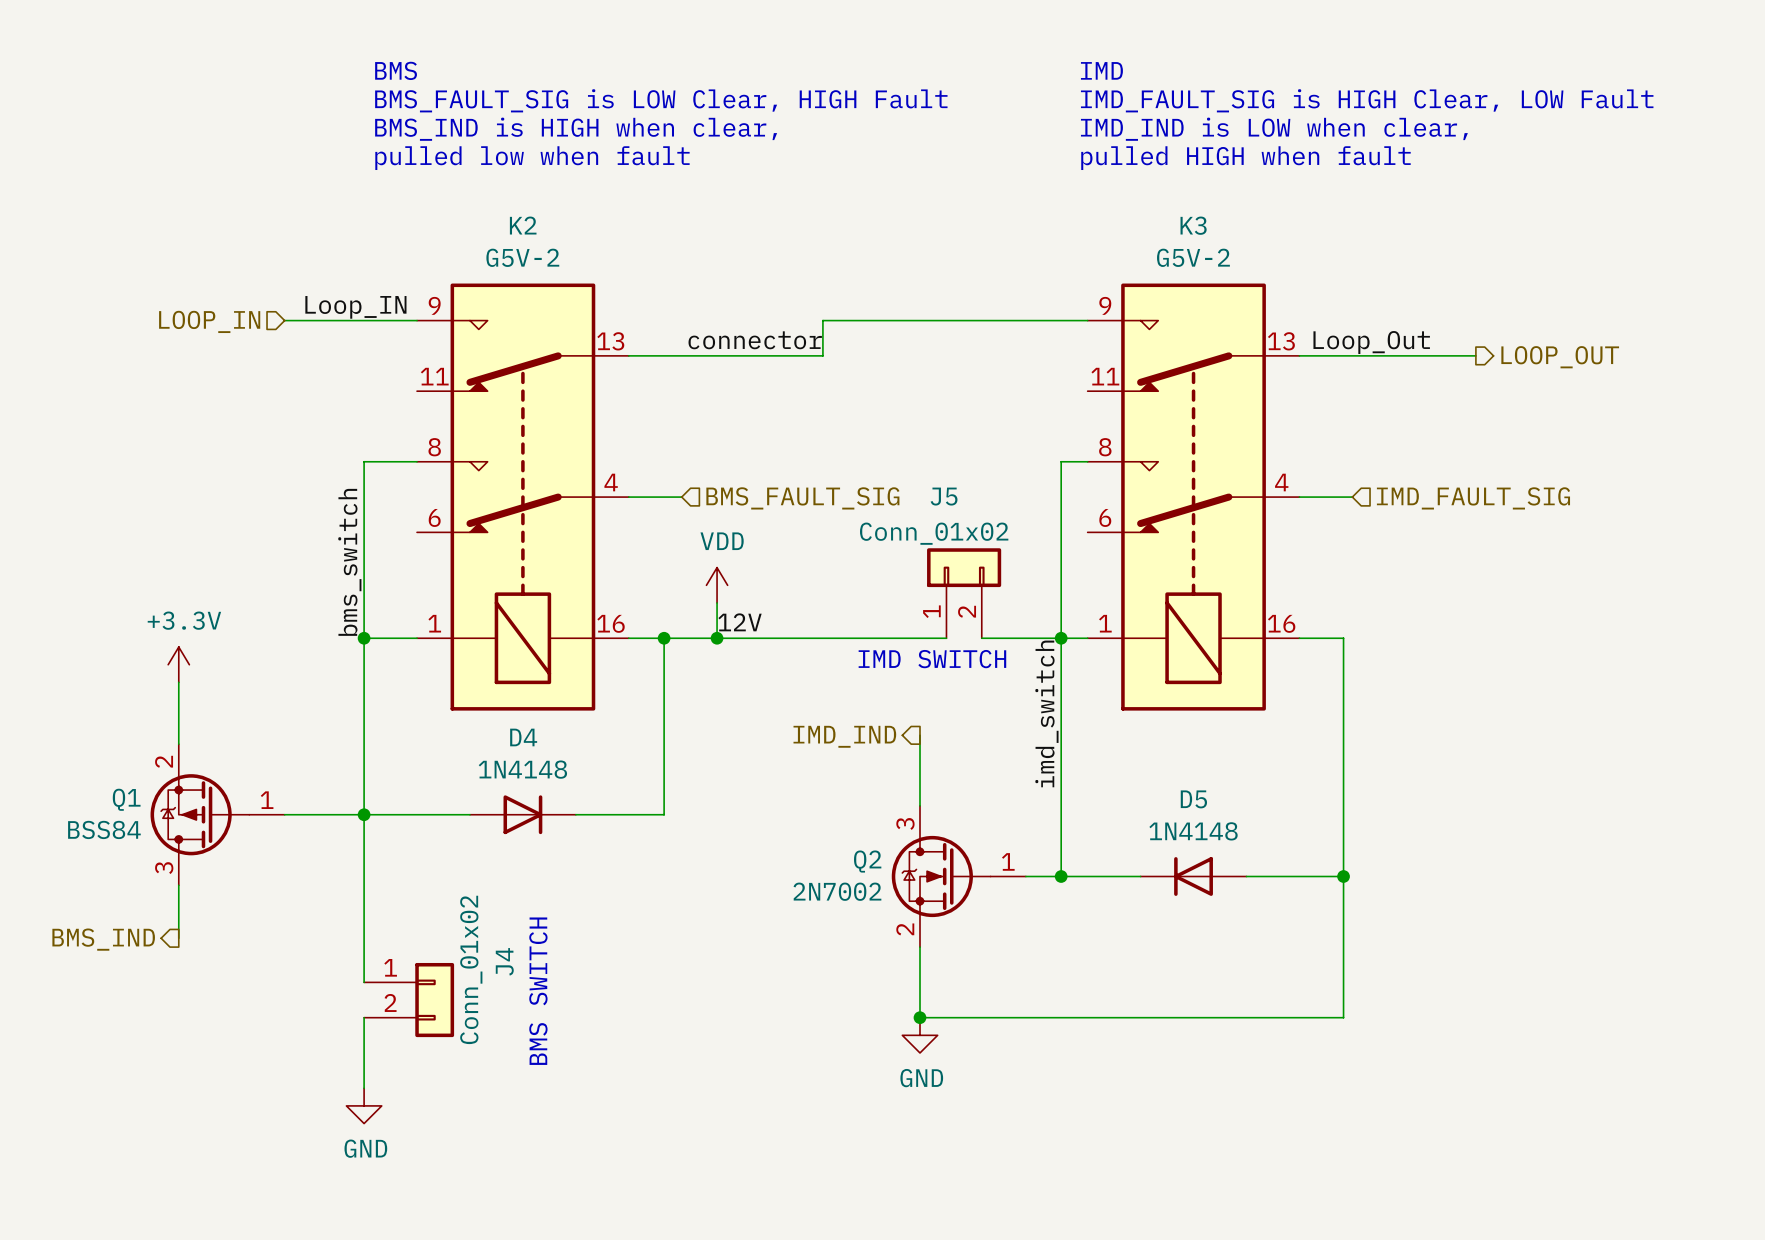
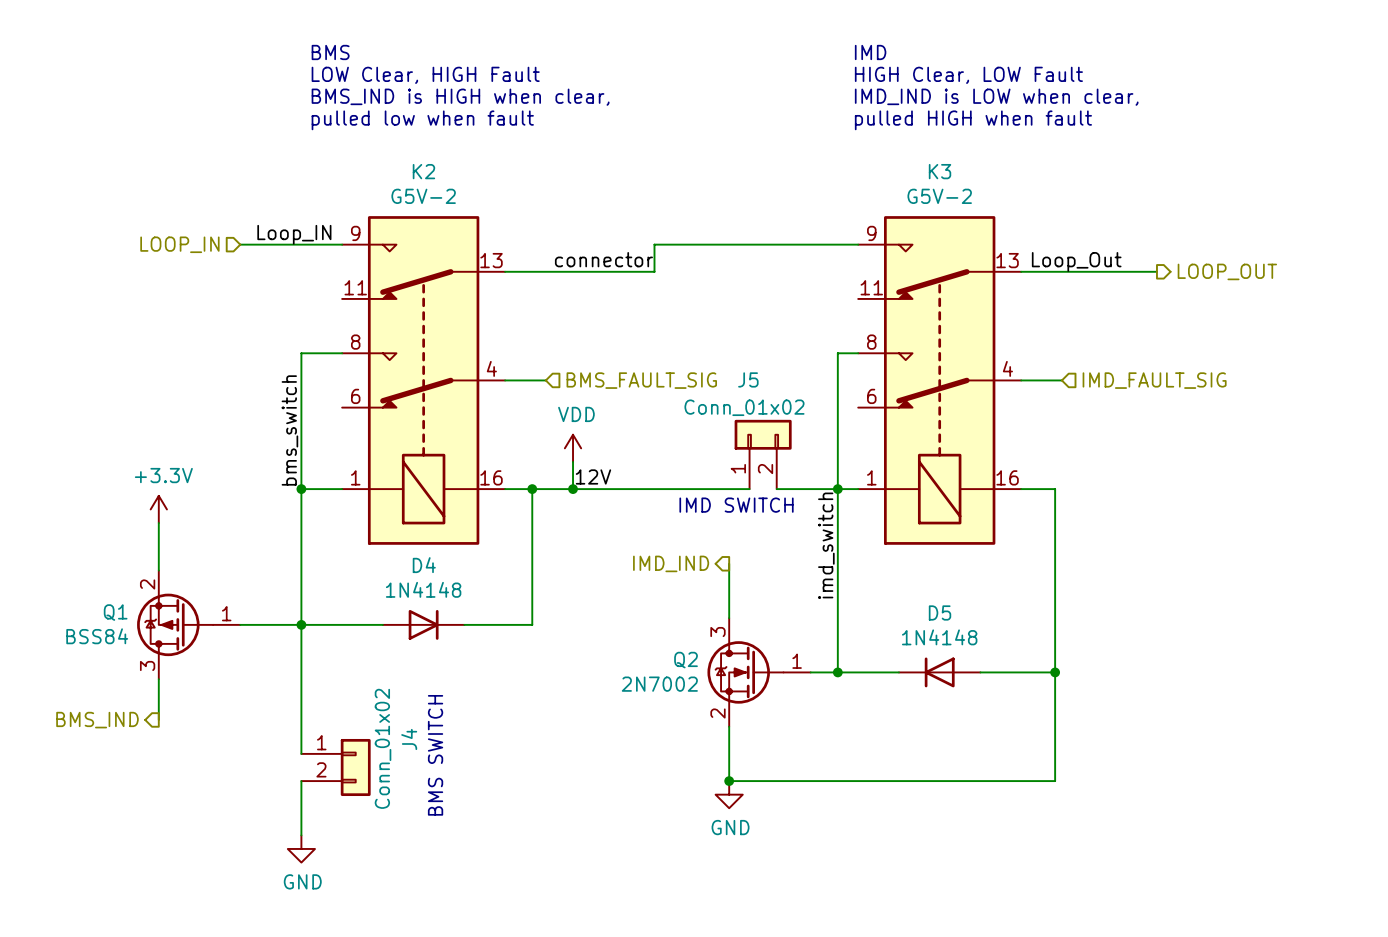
text: BMS_FAULT_SIG is LOW Clear, HIGH Fault (661, 100) -> LOW Clear, HIGH Fault (425, 75)
text: IMD_FAULT_SIG is HIGH Clear, LOW Fault (1367, 100) -> HIGH Clear, LOW Fault (968, 75)

